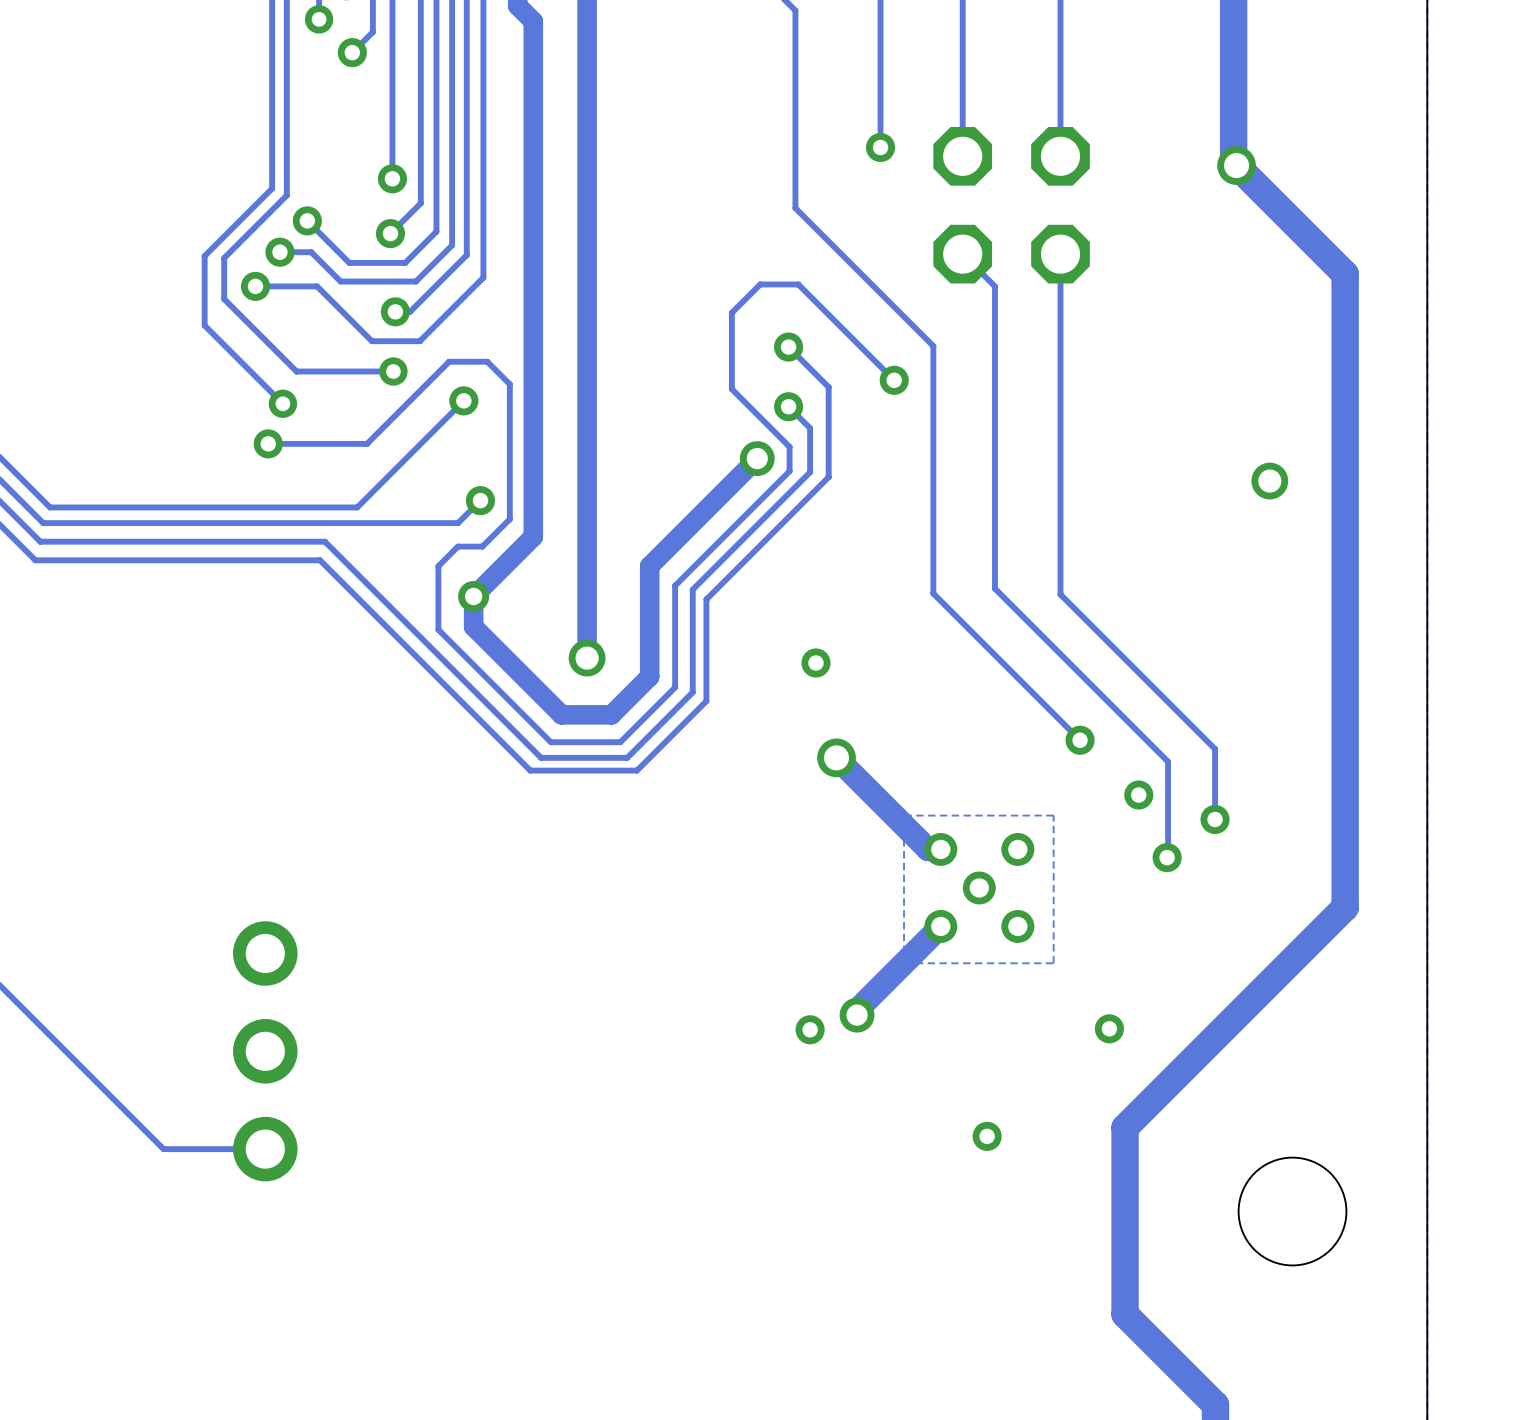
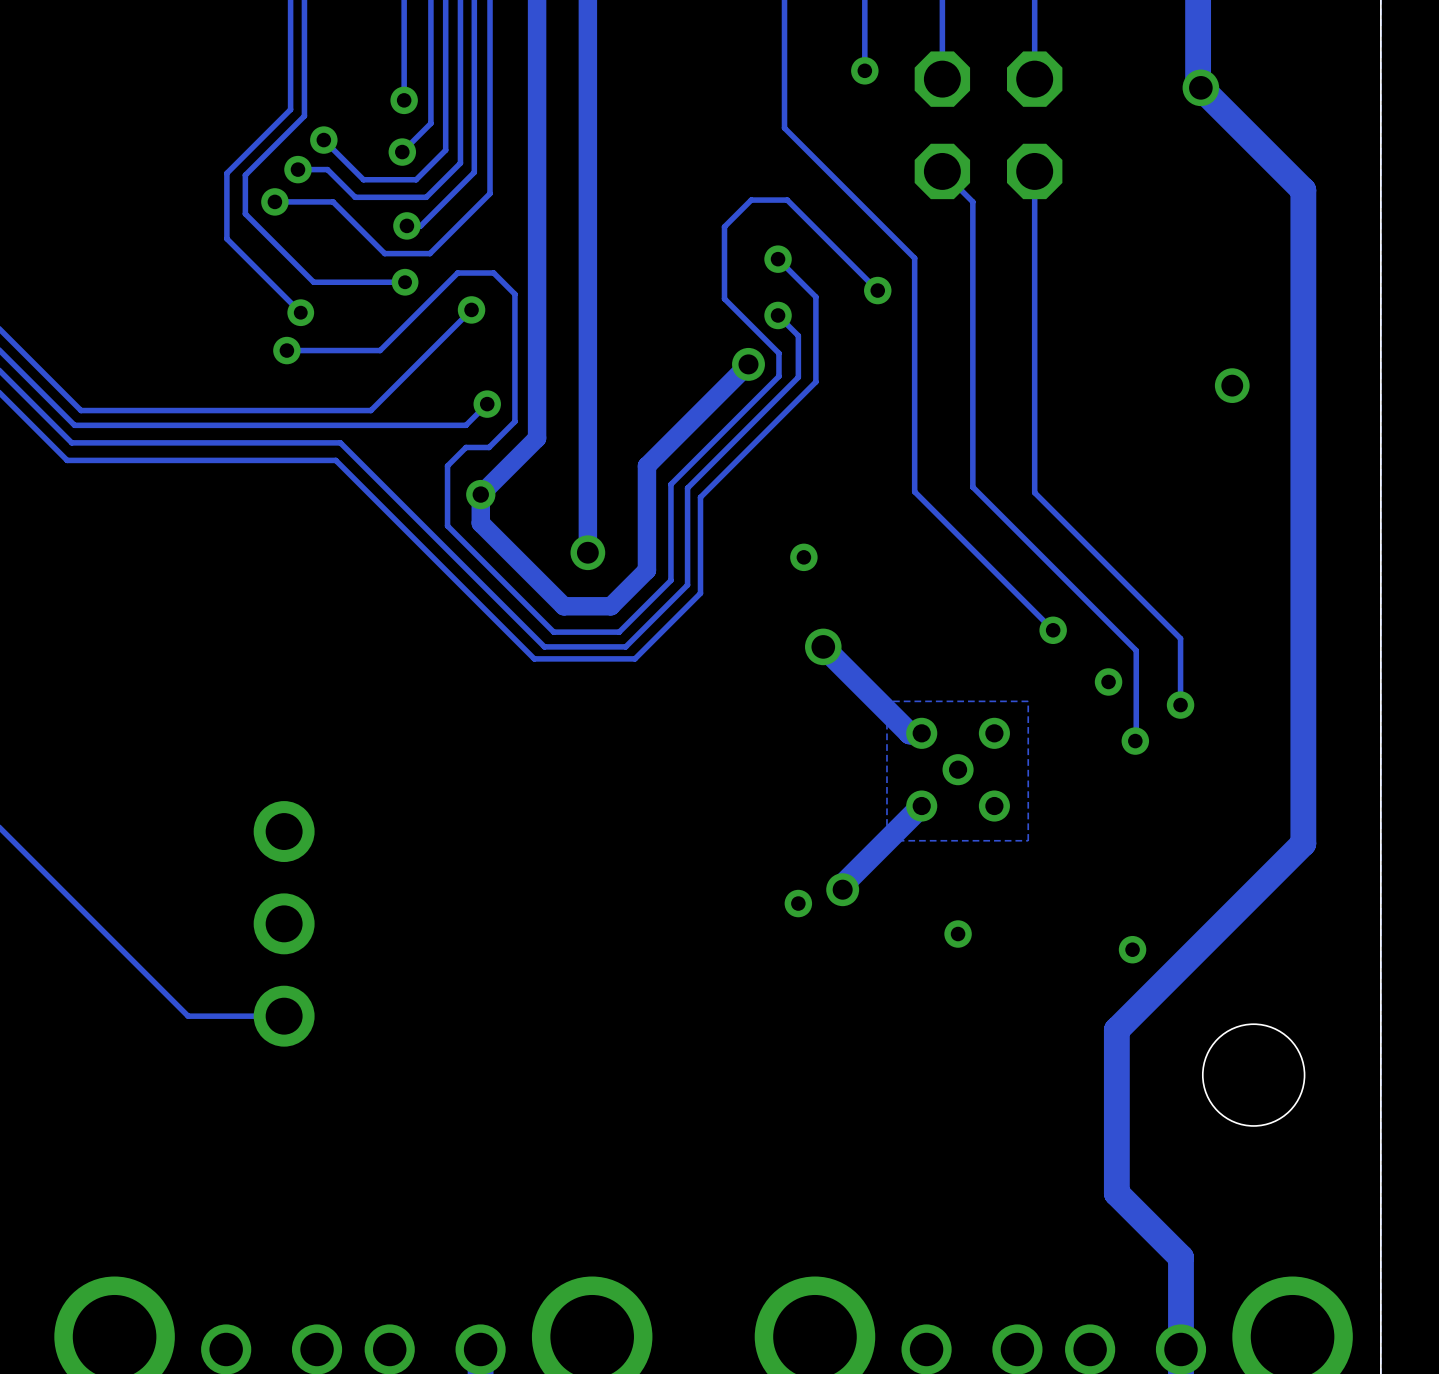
track: (1345, 907) (1125, 1127) (1125, 1314) (1147, 1336) -> (1303, 788) (1303, 843) (1116, 1030) (1116, 1193)
via: (1109, 1028) -> none
via: none -> (958, 934)
via: none -> (1132, 949)
via: (987, 1136) -> none

